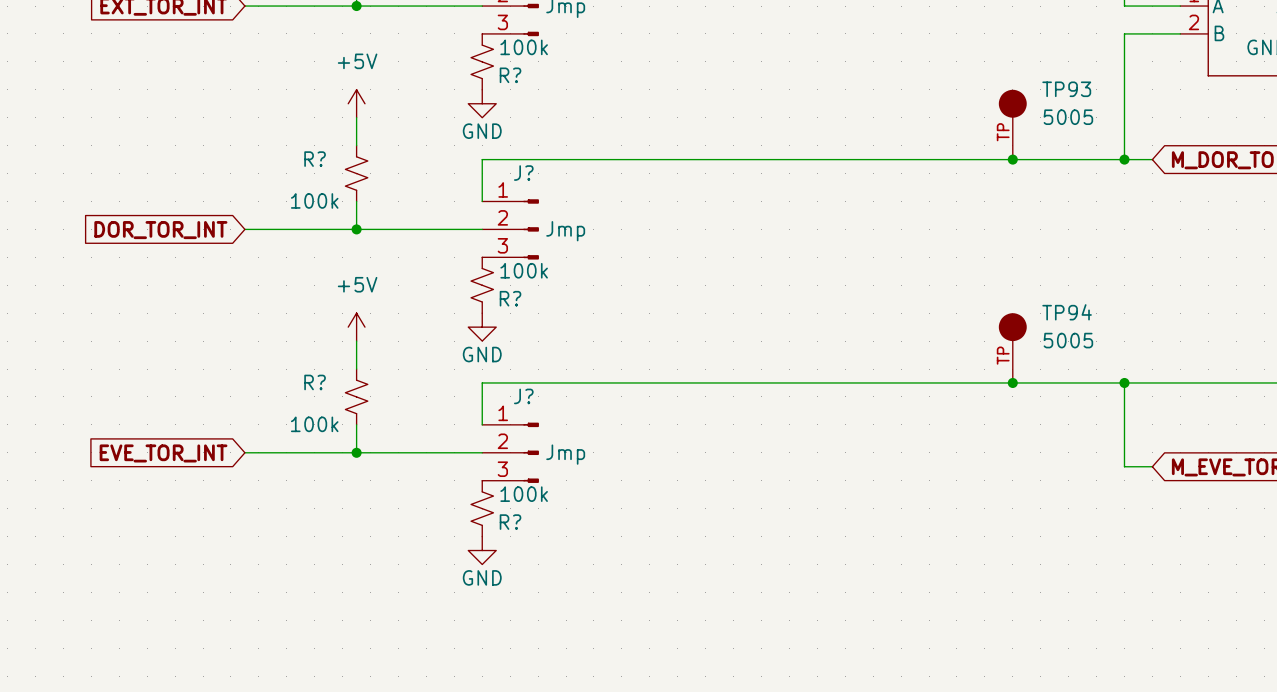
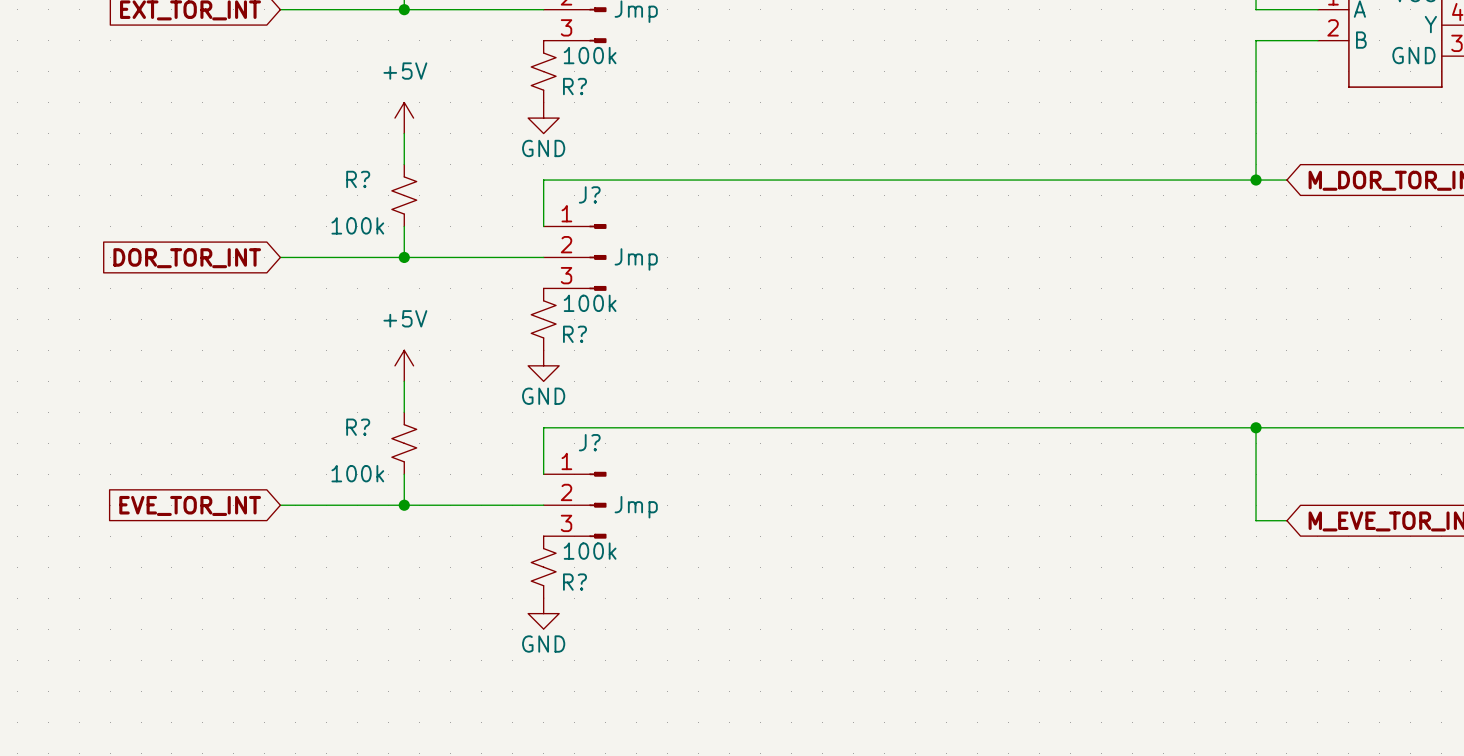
TP93: 5005 (1012, 124) -> none
junction: (1012, 159) -> none
TP94: 5005 (1012, 348) -> none
junction: (1012, 382) -> none

